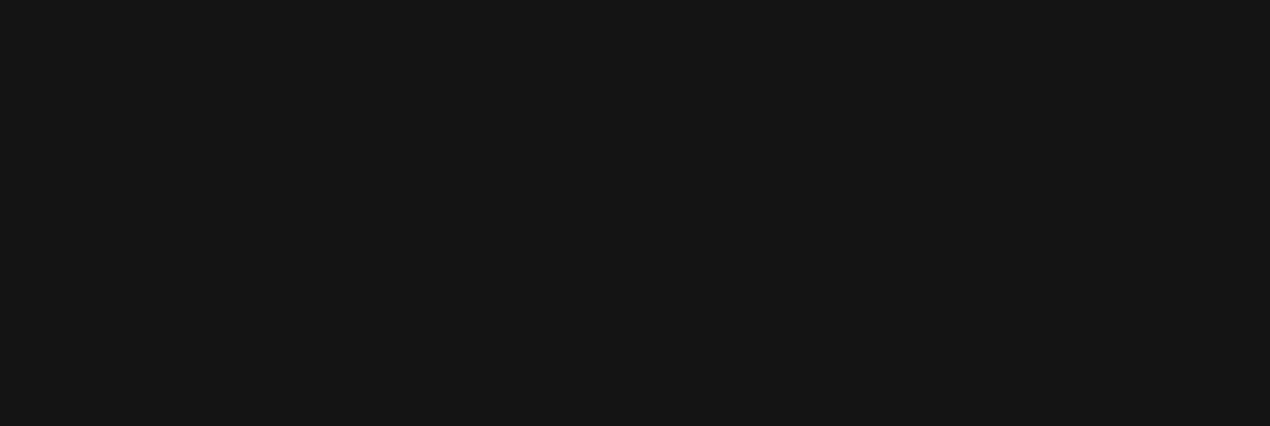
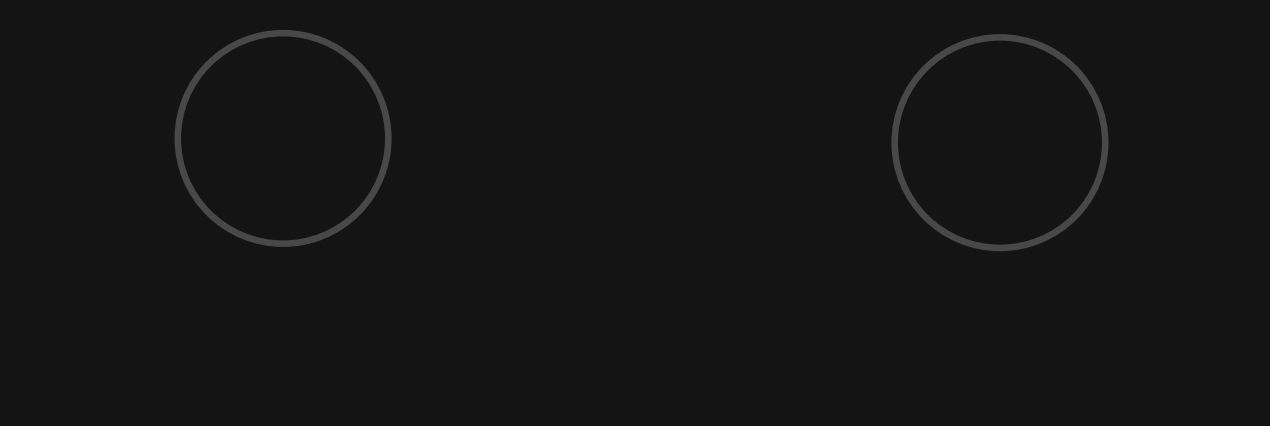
drawing: none -> [174, 29, 392, 247]
drawing: none -> [891, 34, 1109, 252]

